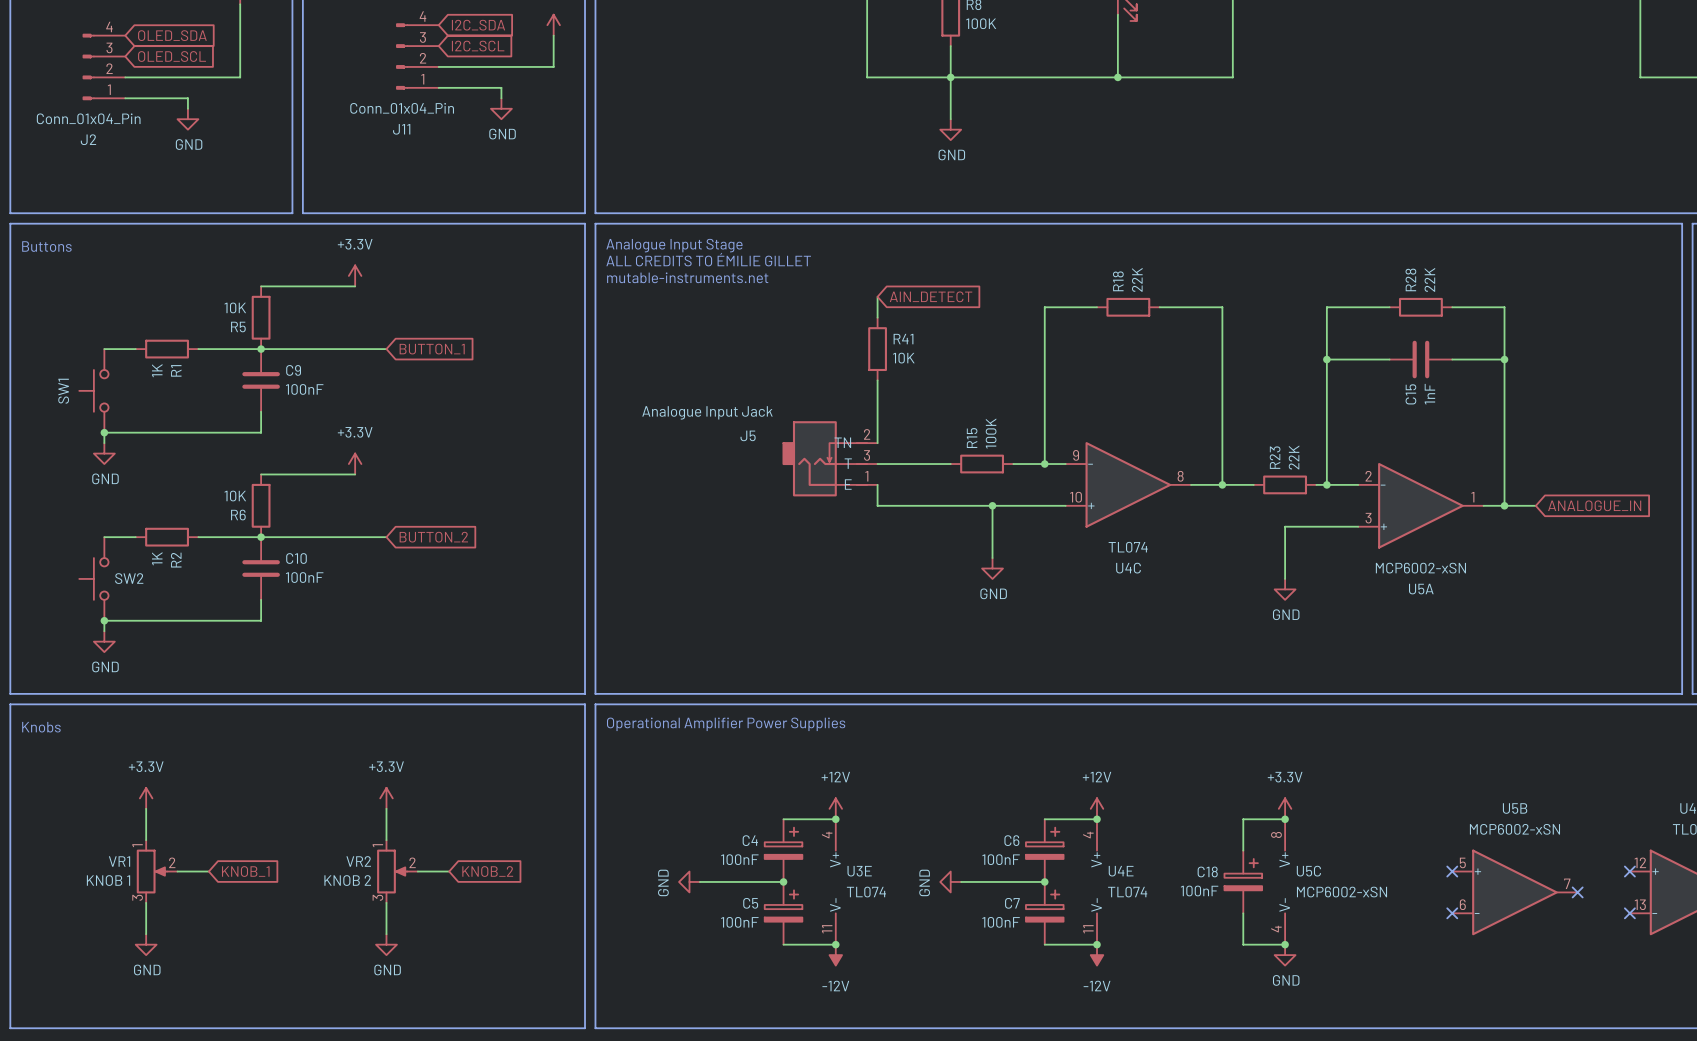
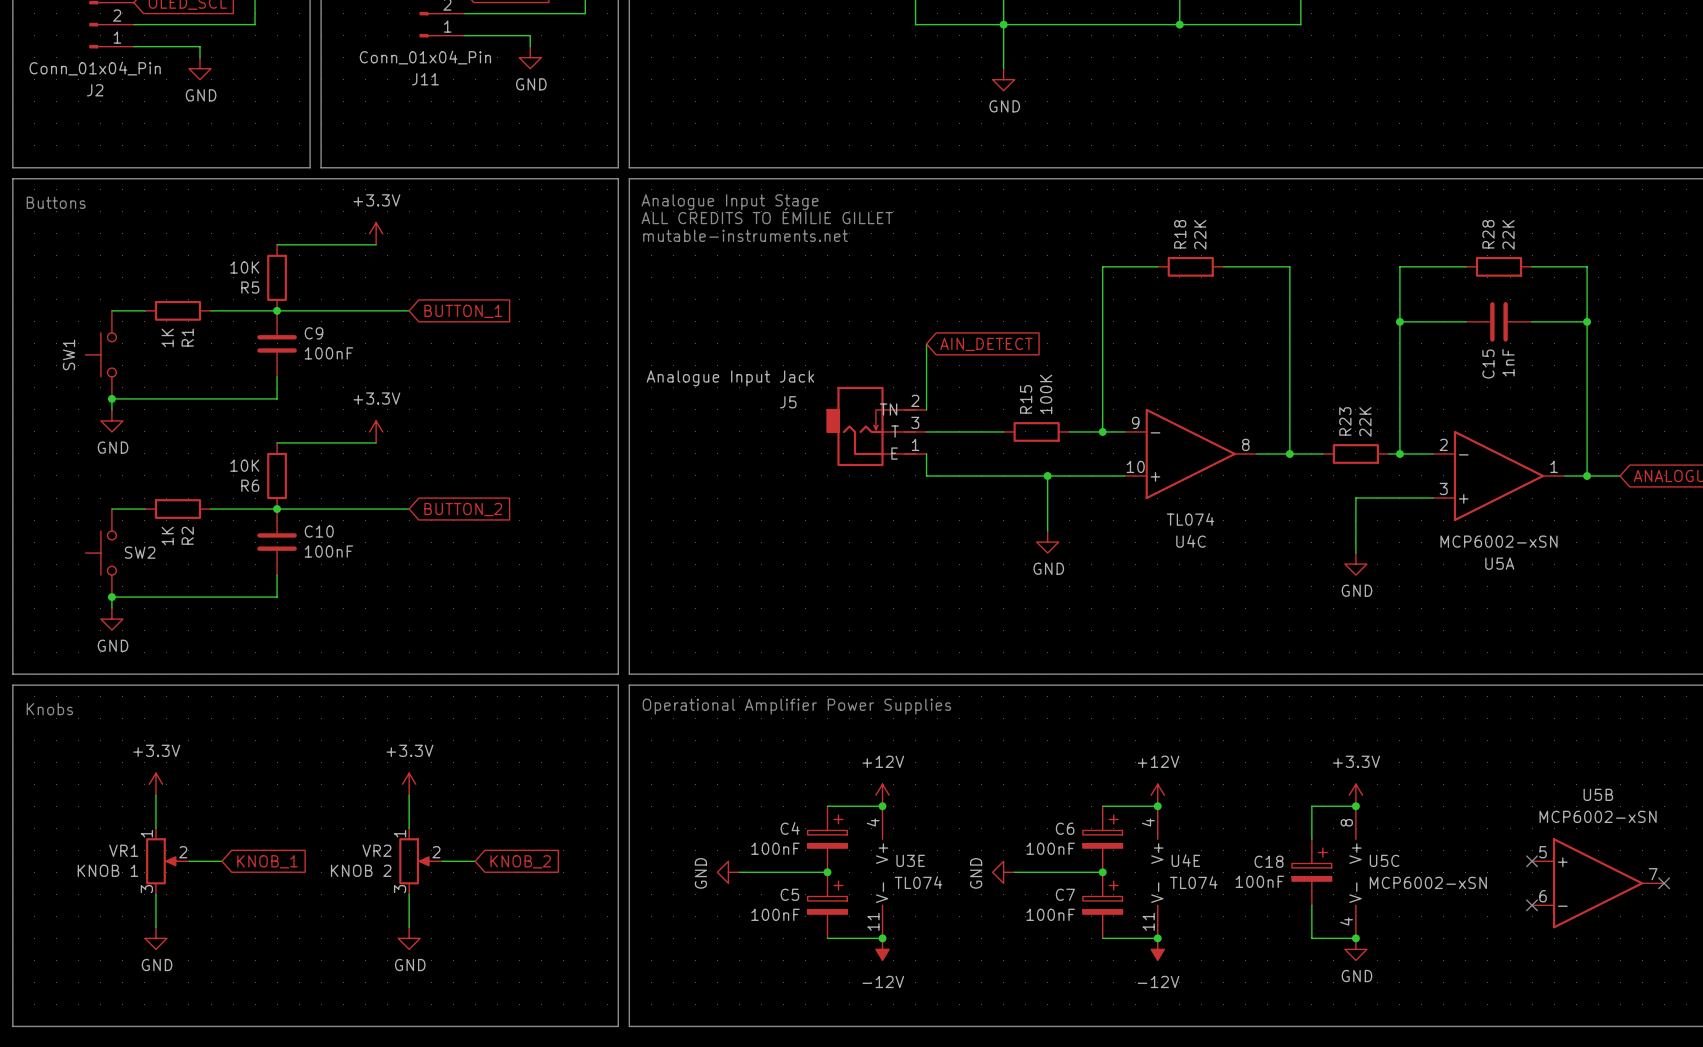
wire: (877, 296) (877, 317) -> none
global label position: AIN_DETECT (931, 296) -> AIN_DETECT (986, 344)
R41: 10K (877, 349) -> none

